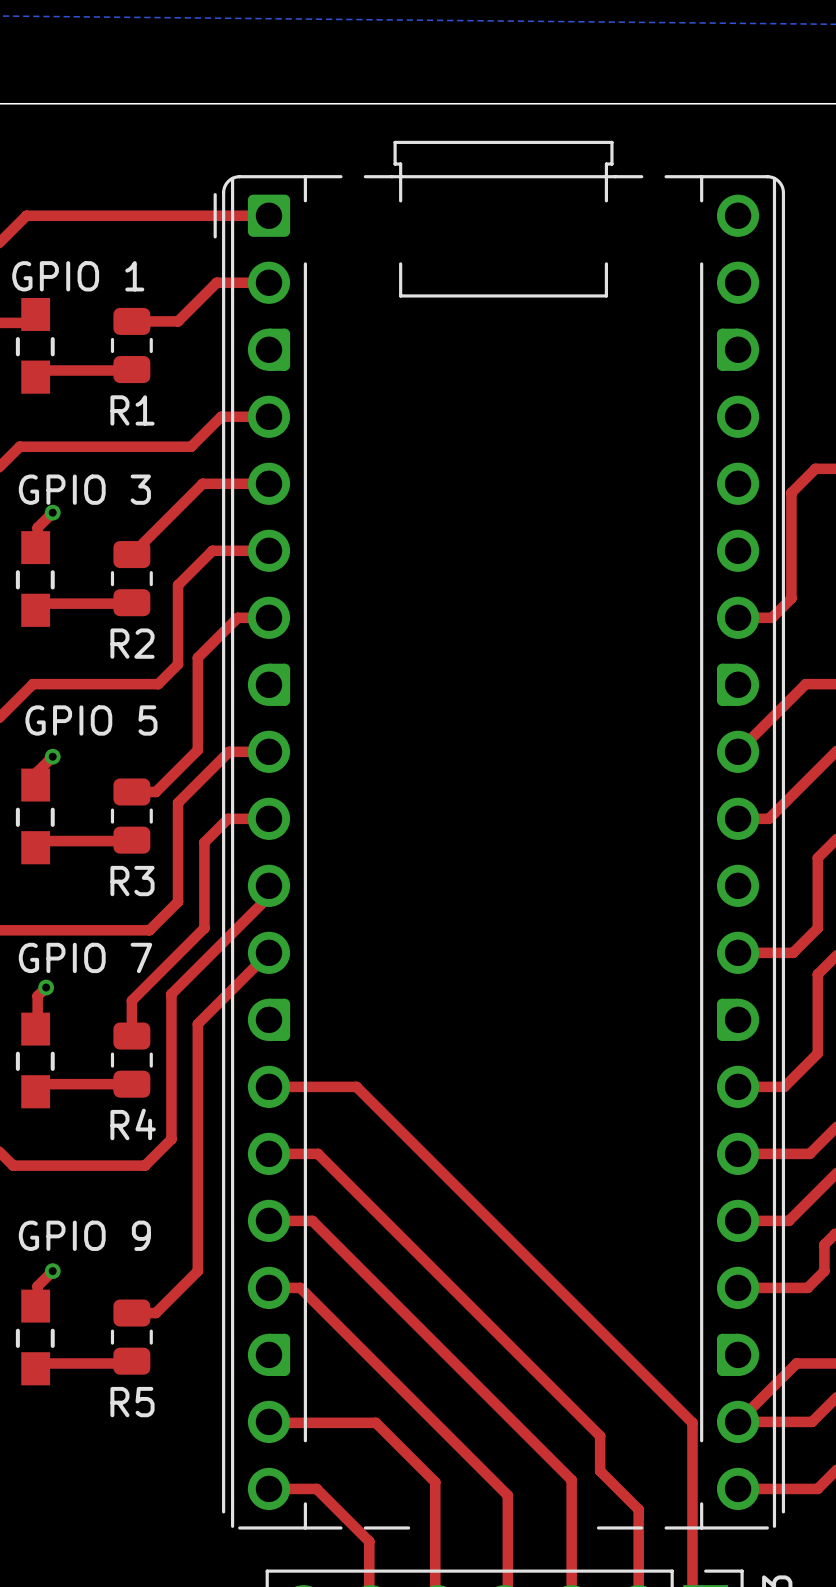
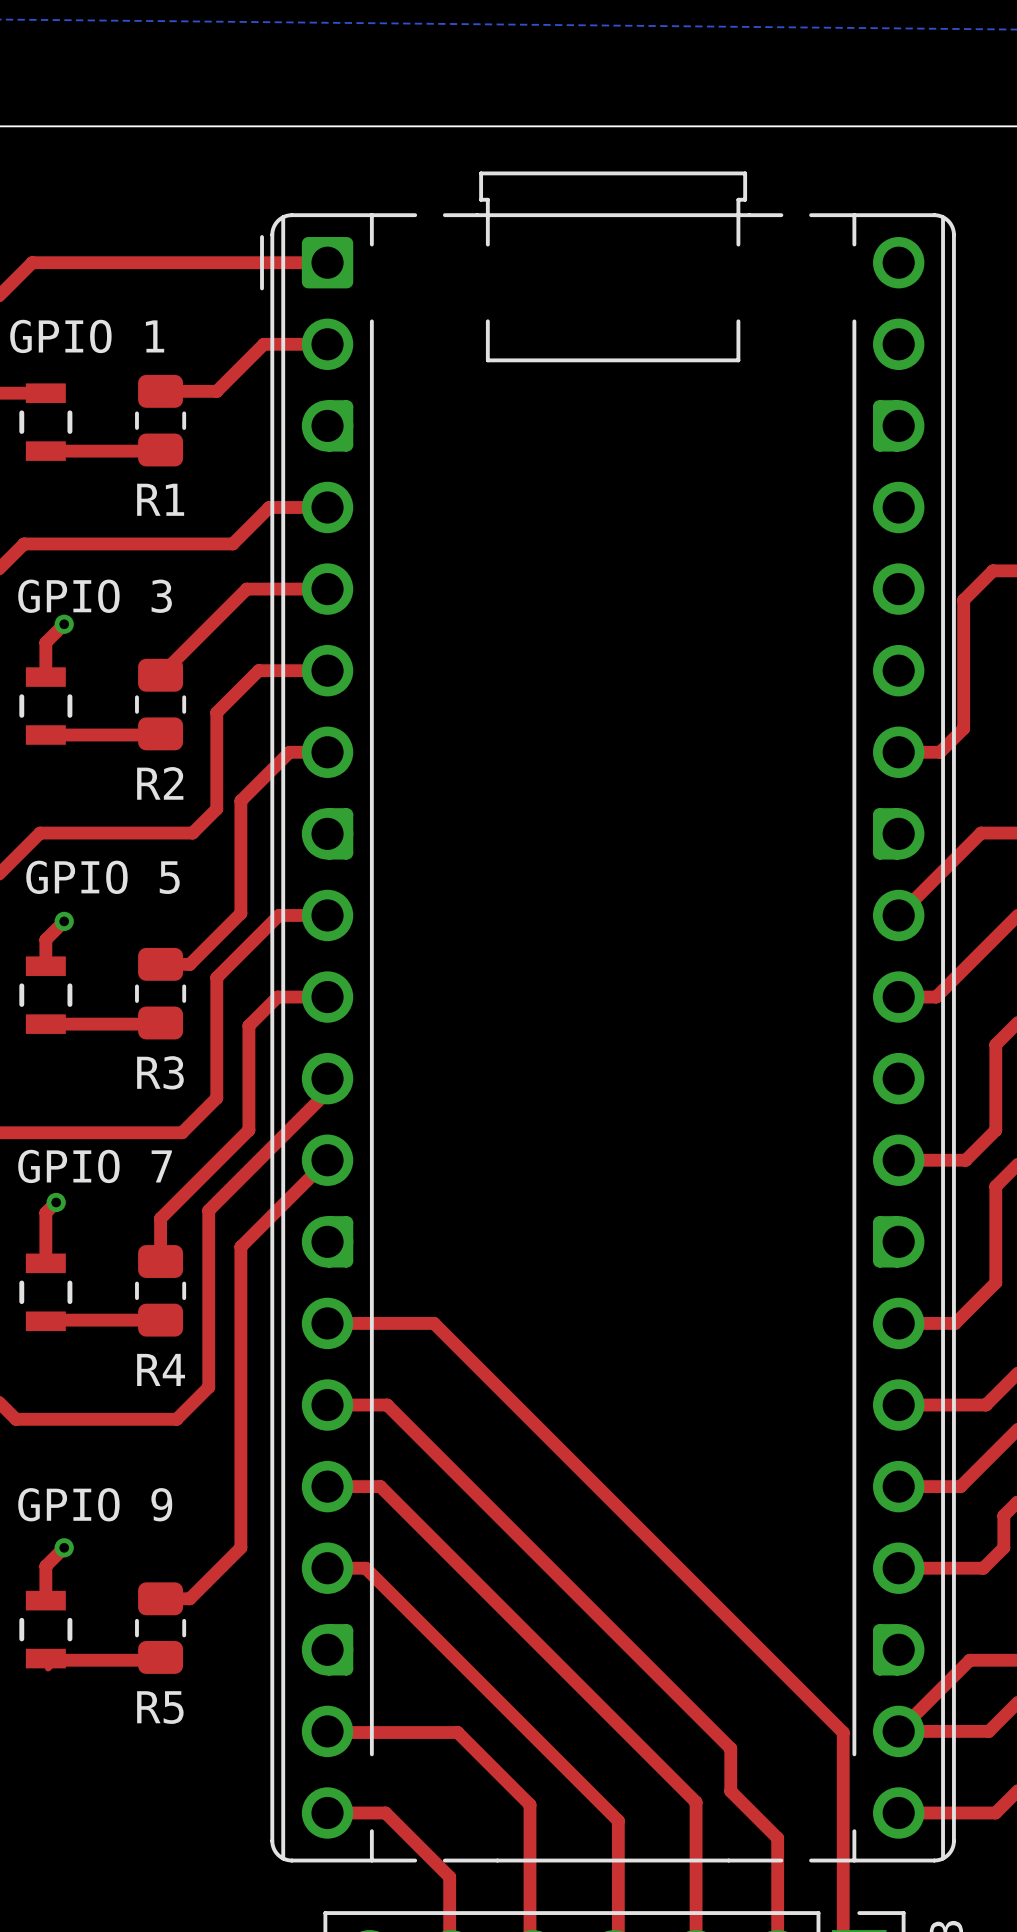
part footprint: [213, 140, 786, 1530] -> [260, 171, 956, 1863]
part footprint: [15, 297, 55, 394] -> [19, 383, 73, 461]
part footprint: [15, 531, 55, 627] -> [19, 667, 73, 745]
part footprint: [15, 768, 55, 865] -> [19, 956, 73, 1034]
part footprint: [15, 1012, 55, 1109] -> [19, 1253, 73, 1332]
part footprint: [15, 1289, 55, 1386] -> [19, 1590, 73, 1669]

